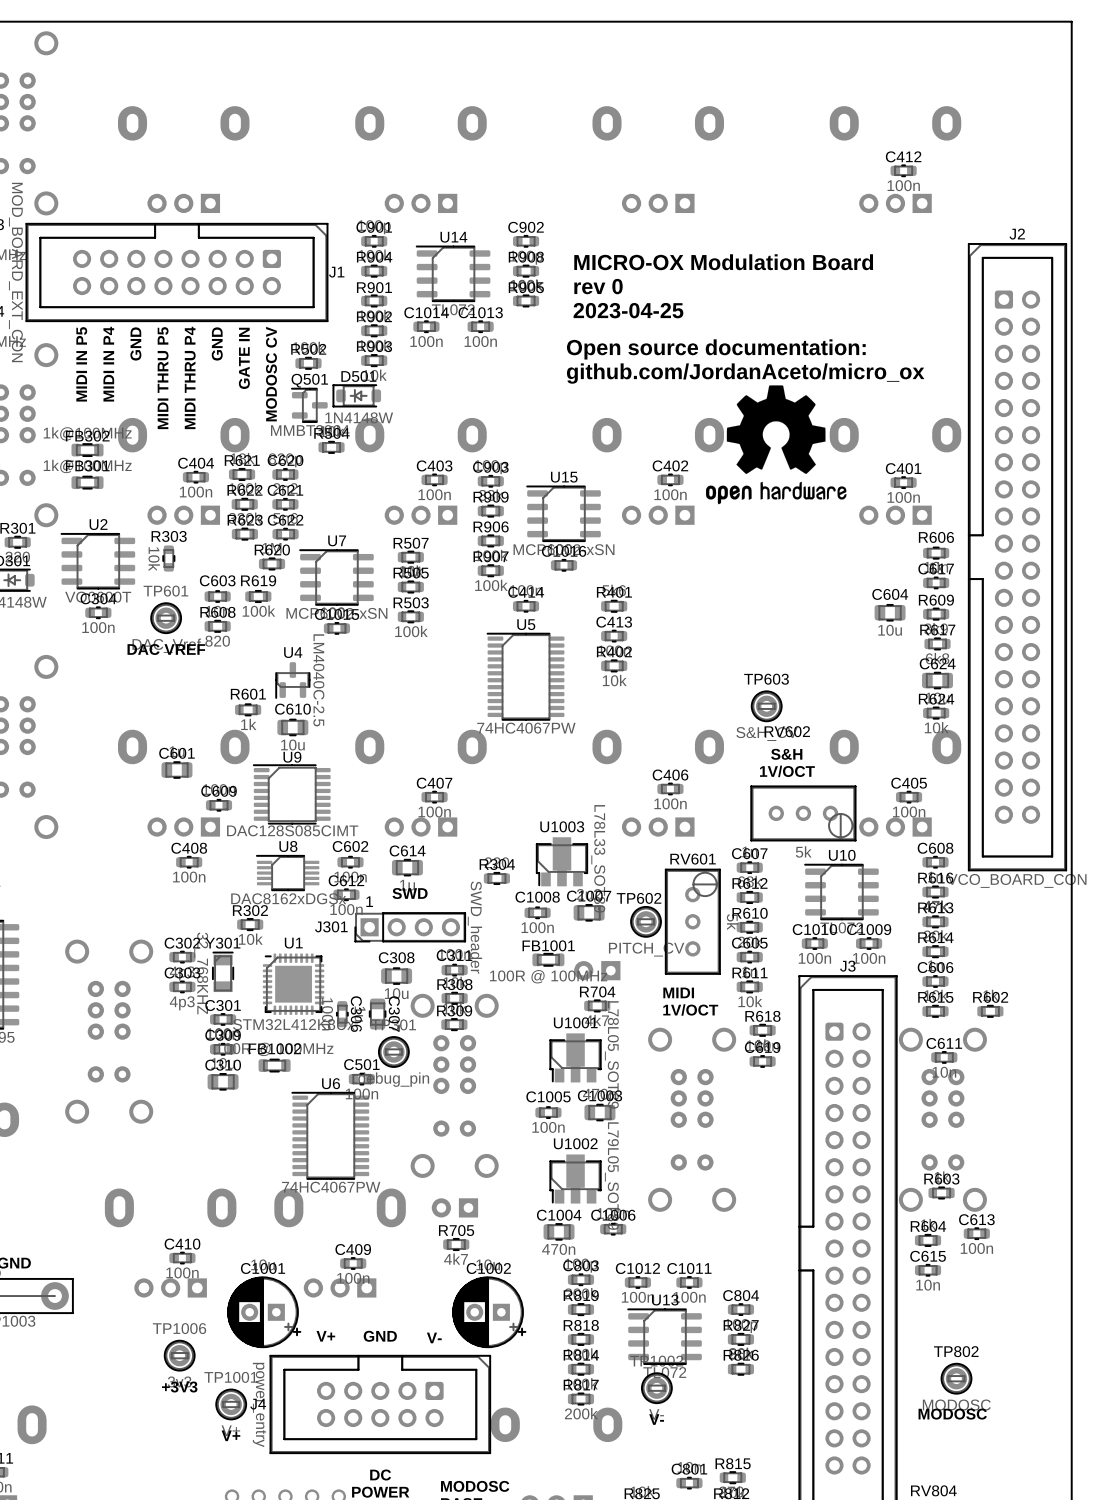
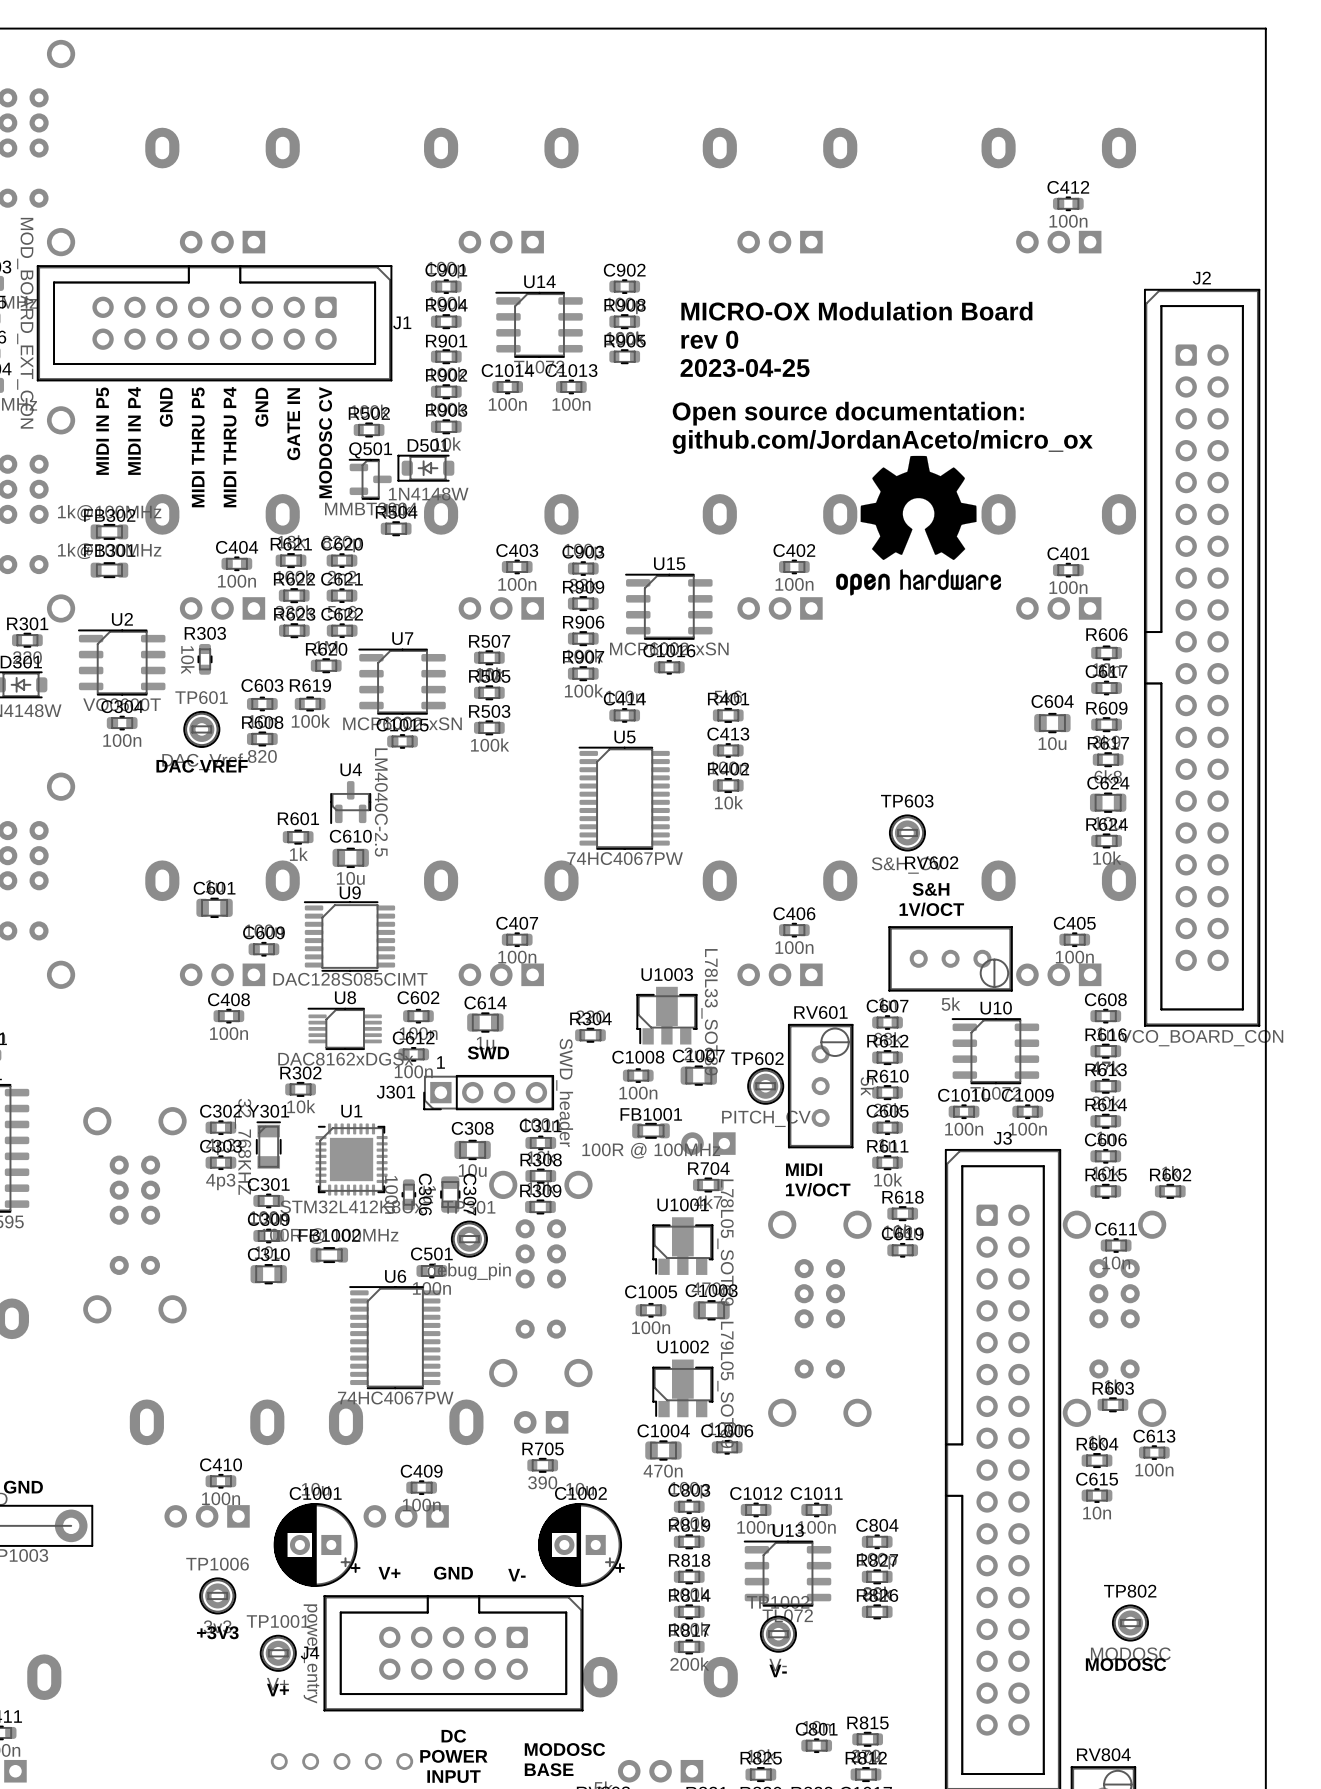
R705 value: 4k7 (456, 1259) -> 390 (542, 1482)

